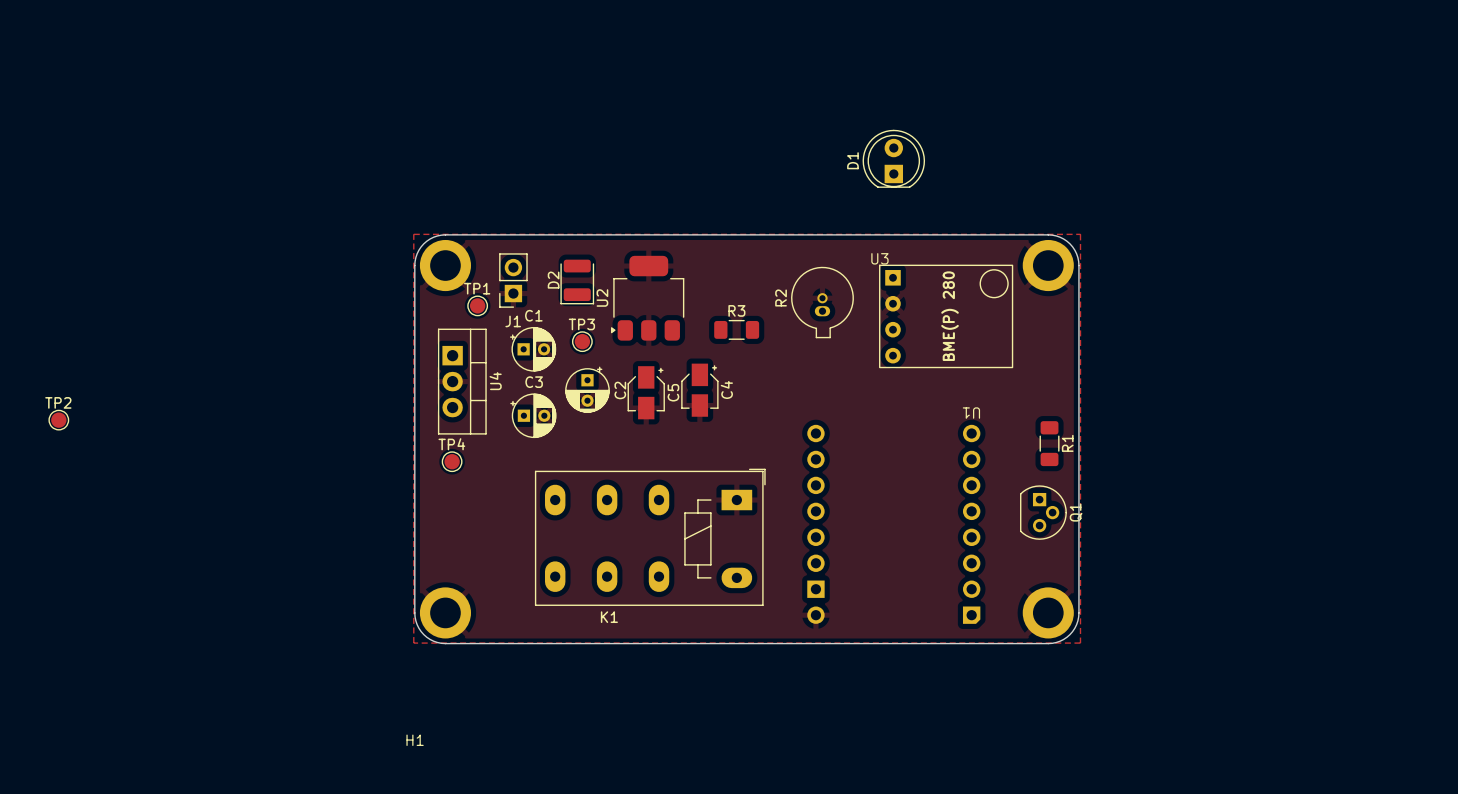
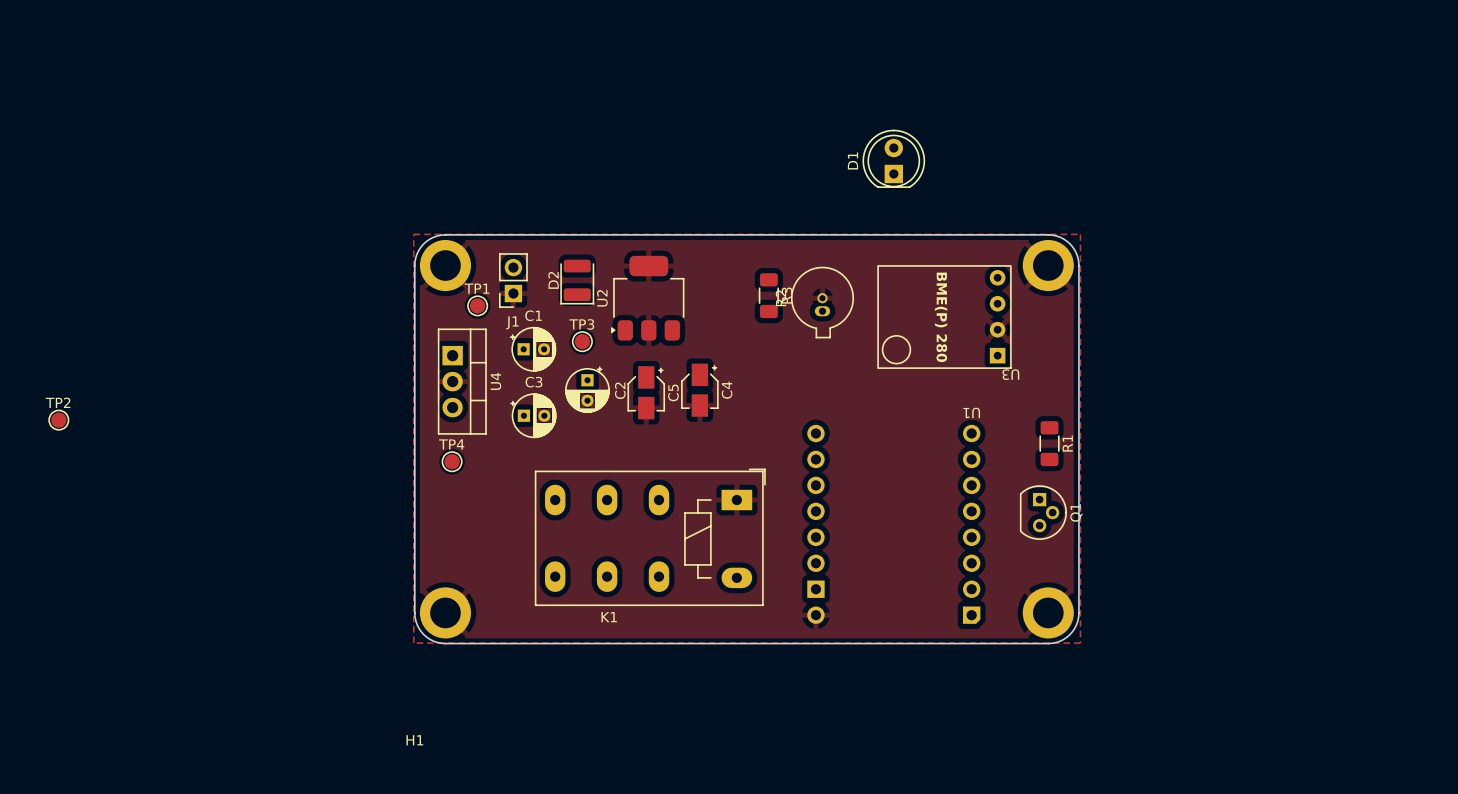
U3 rotation: 0° (946, 316) -> 180° (944, 317)
R3 rotation: 0° (736, 329) -> 90° clockwise (768, 295)
R3 position: (736, 329) -> (768, 295)

